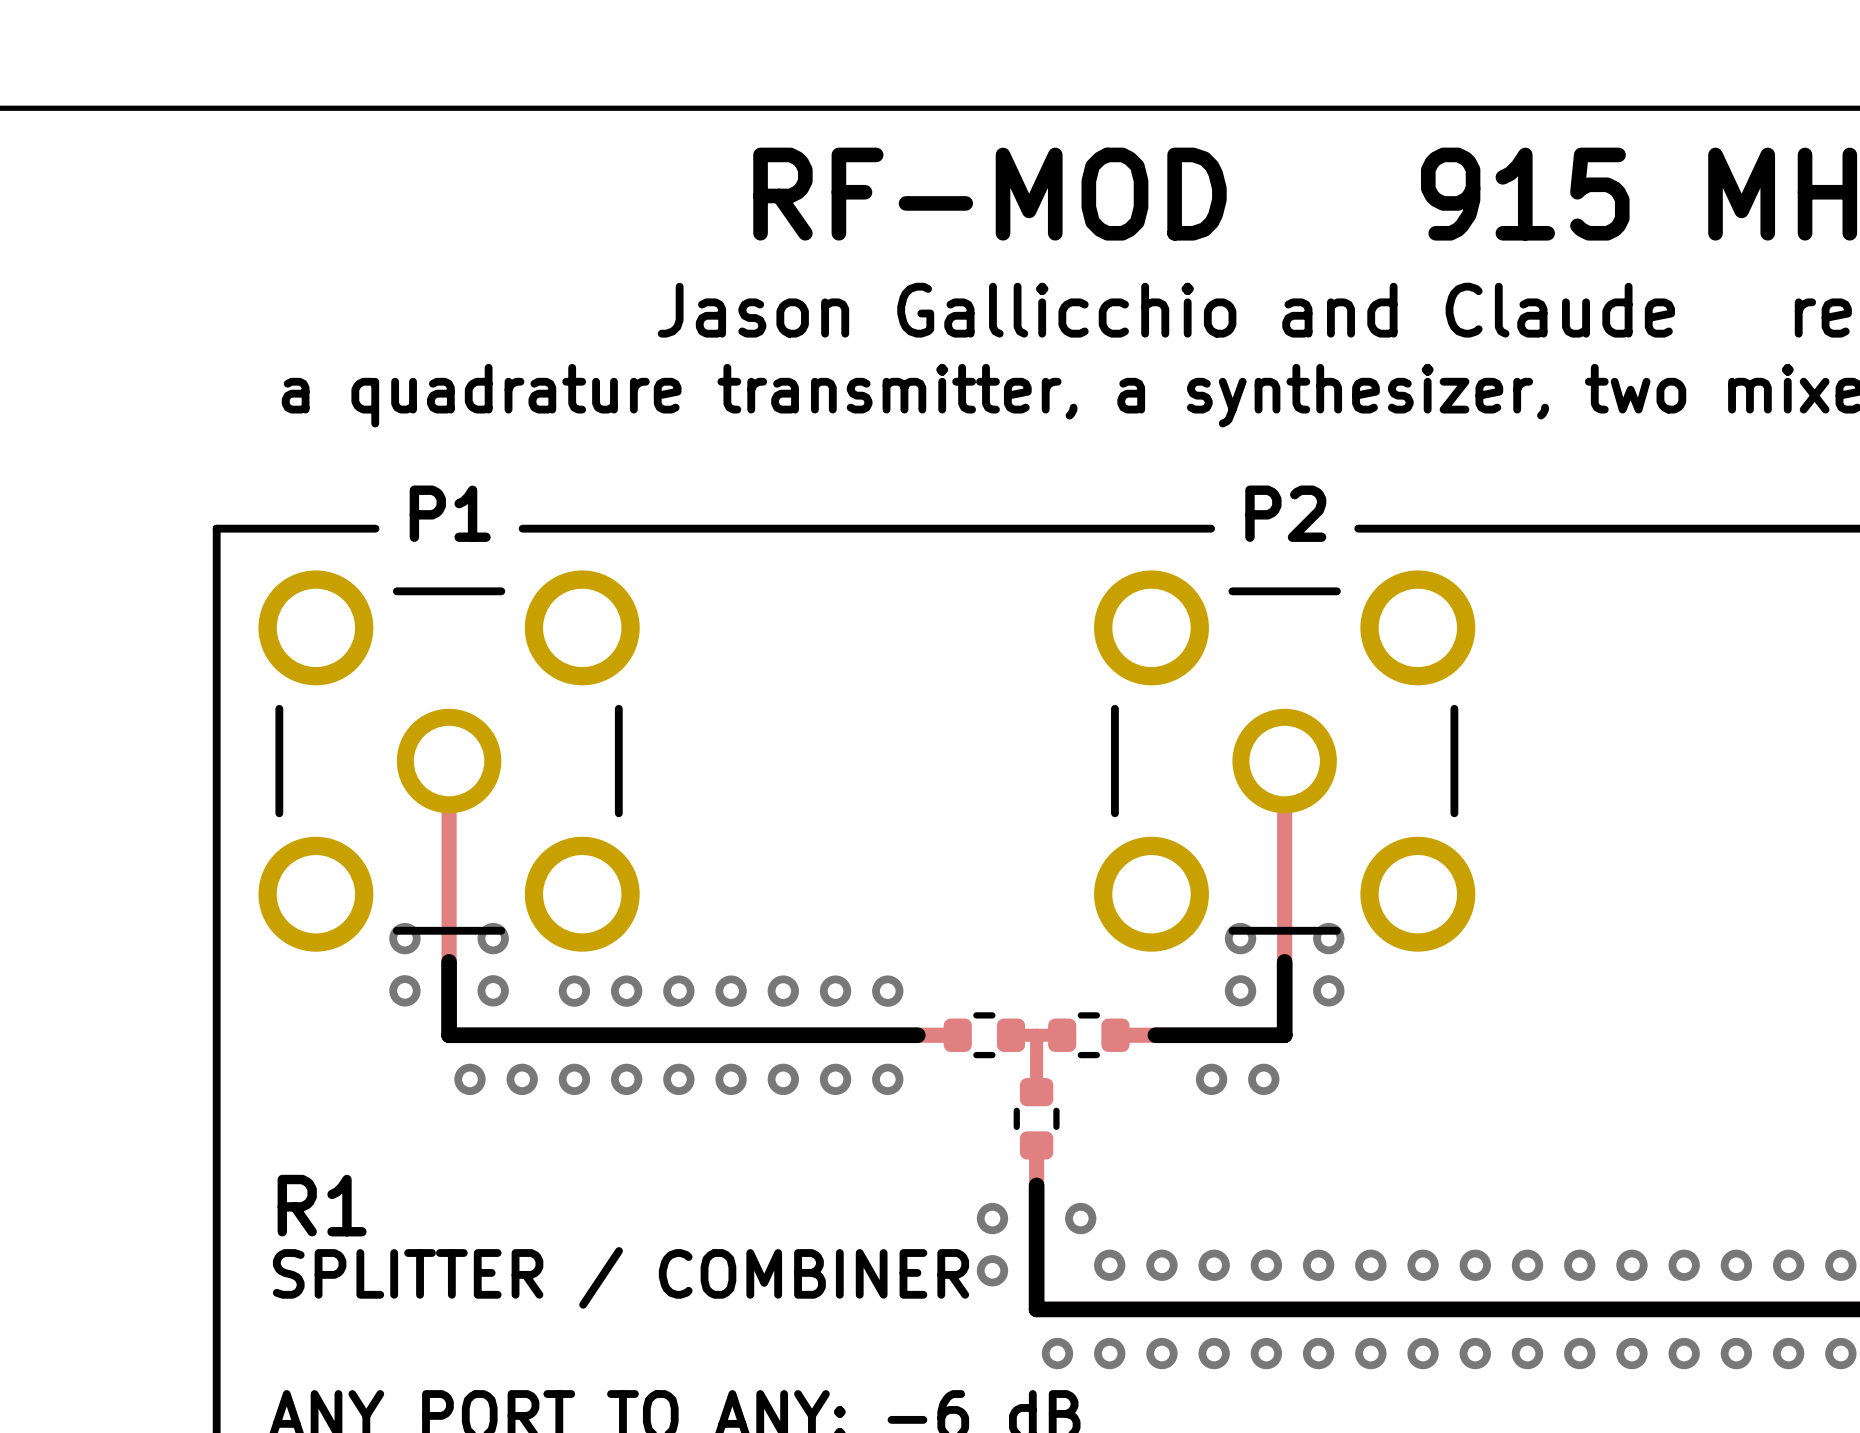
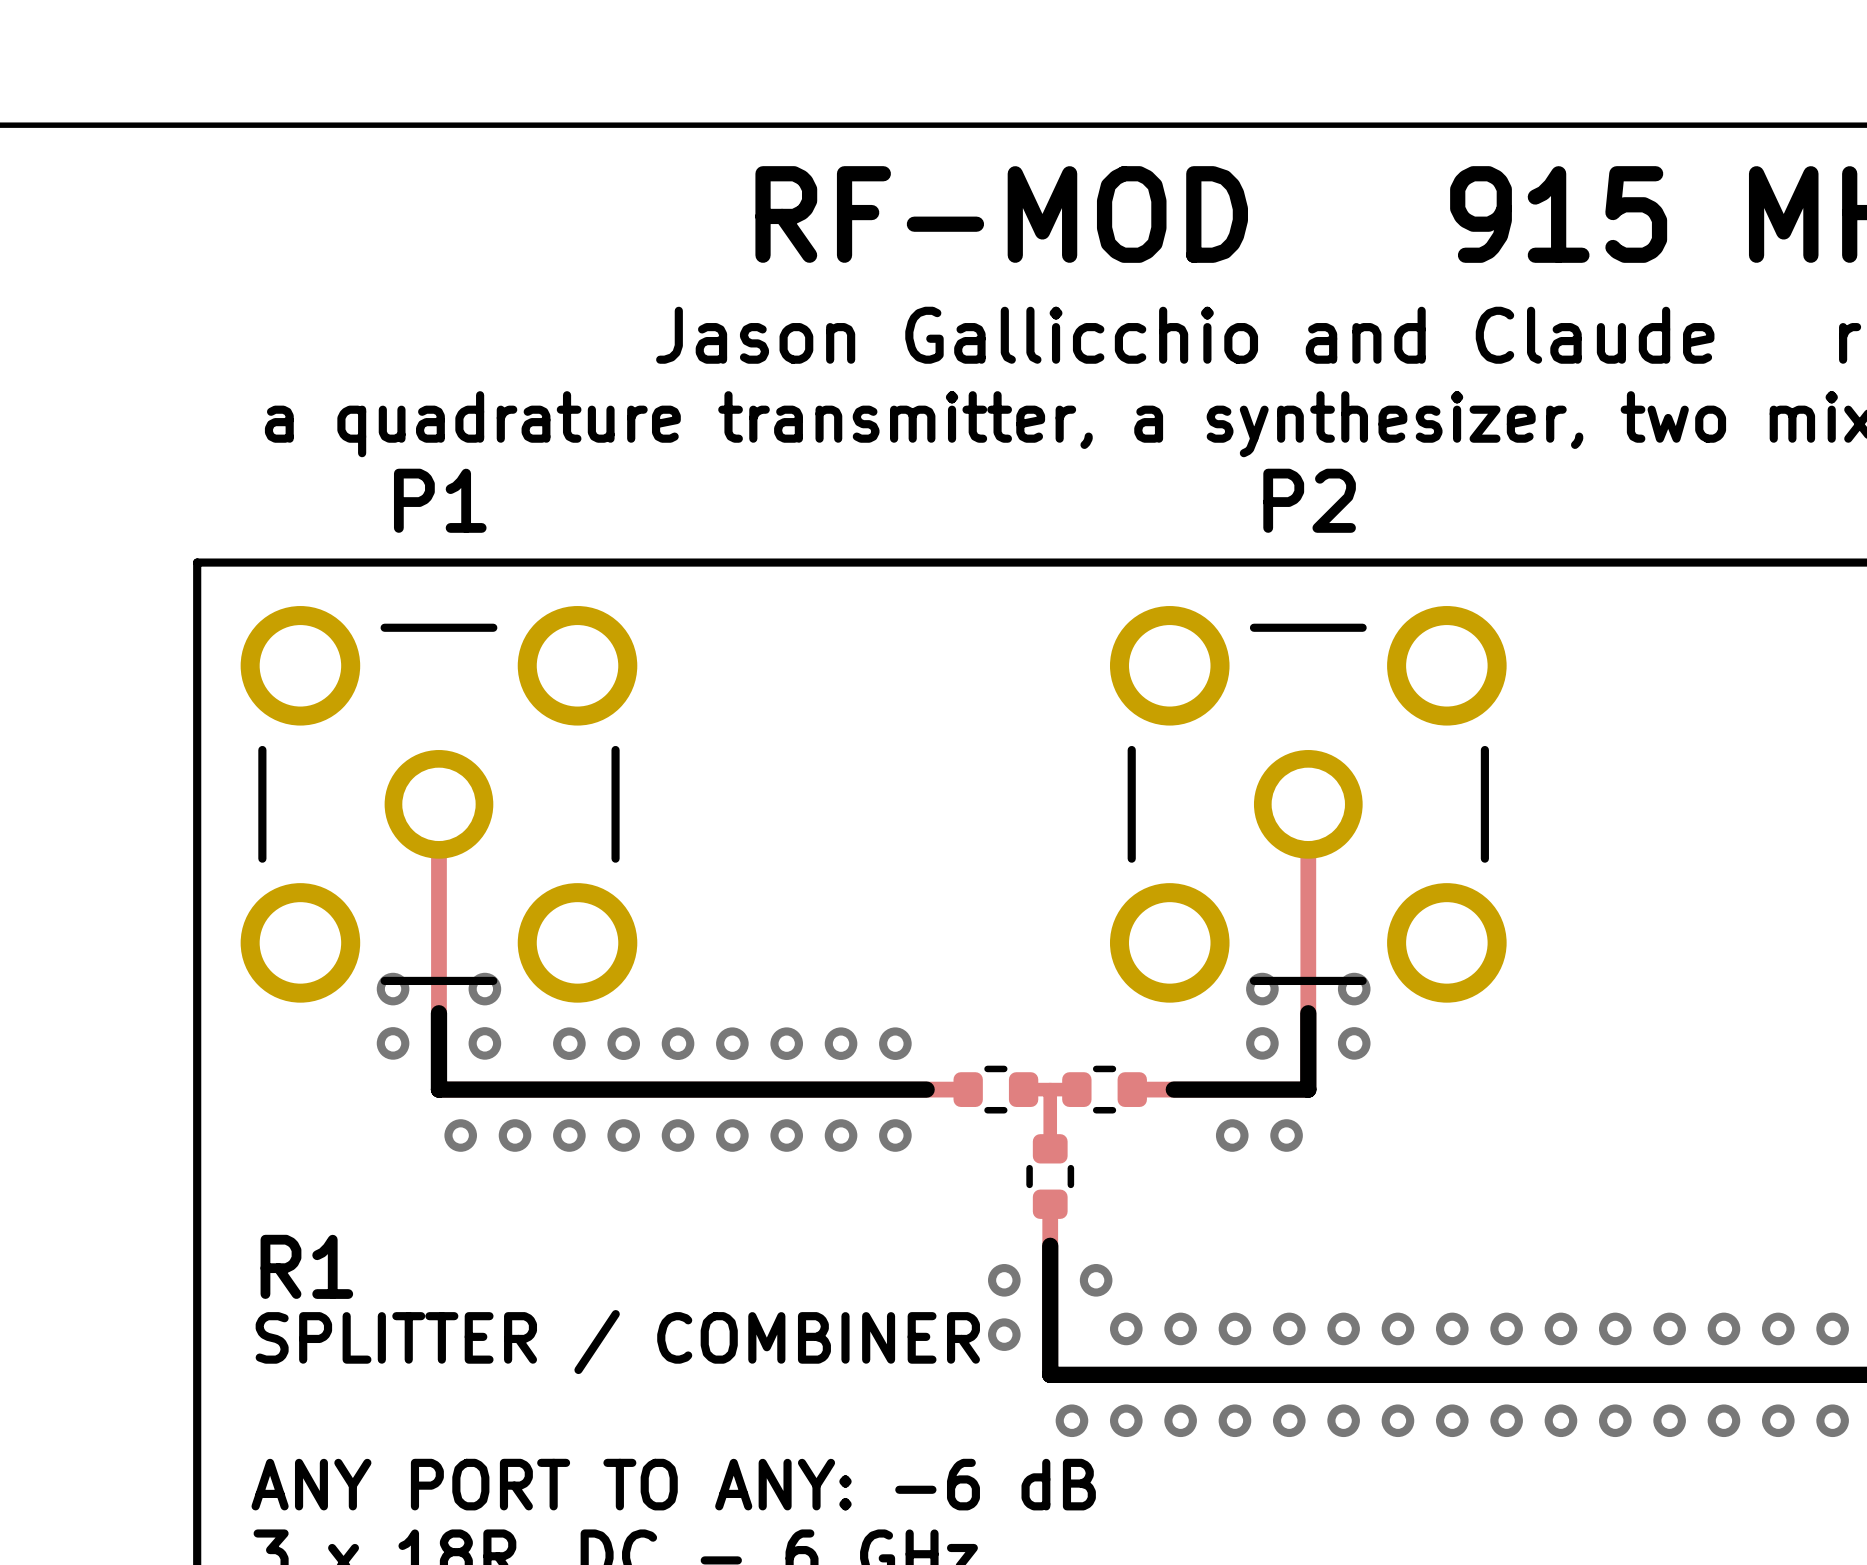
text position: P1 (450, 513) -> P1 (440, 500)
text position: P2 (1285, 513) -> P2 (1309, 500)
line: none -> (362, 562) (515, 562)
line: none -> (1231, 562) (1384, 562)

